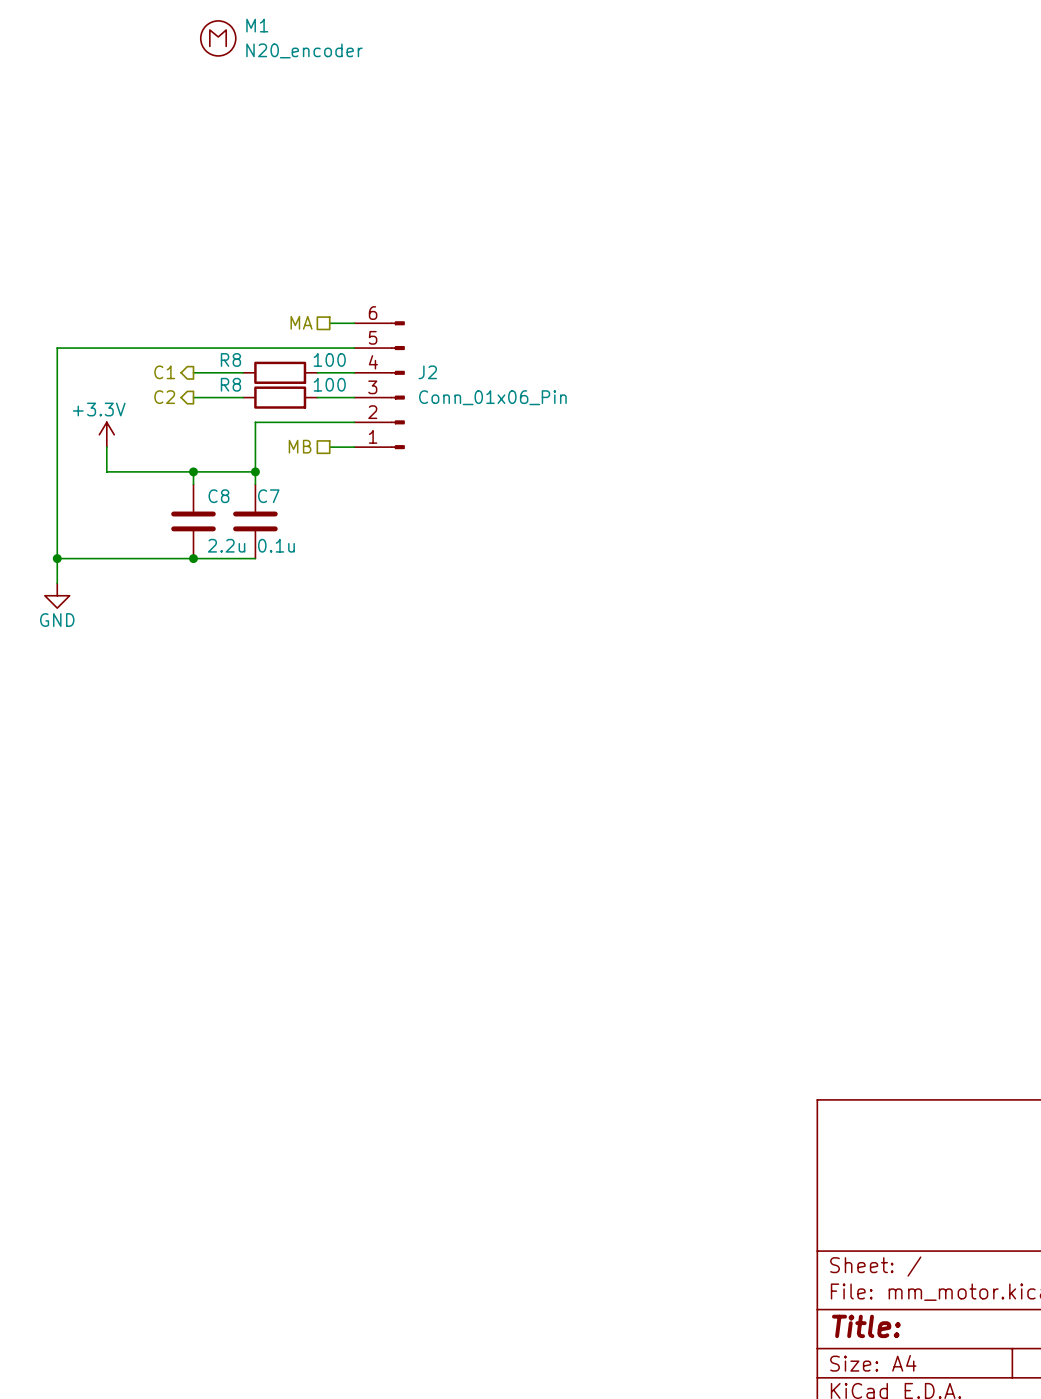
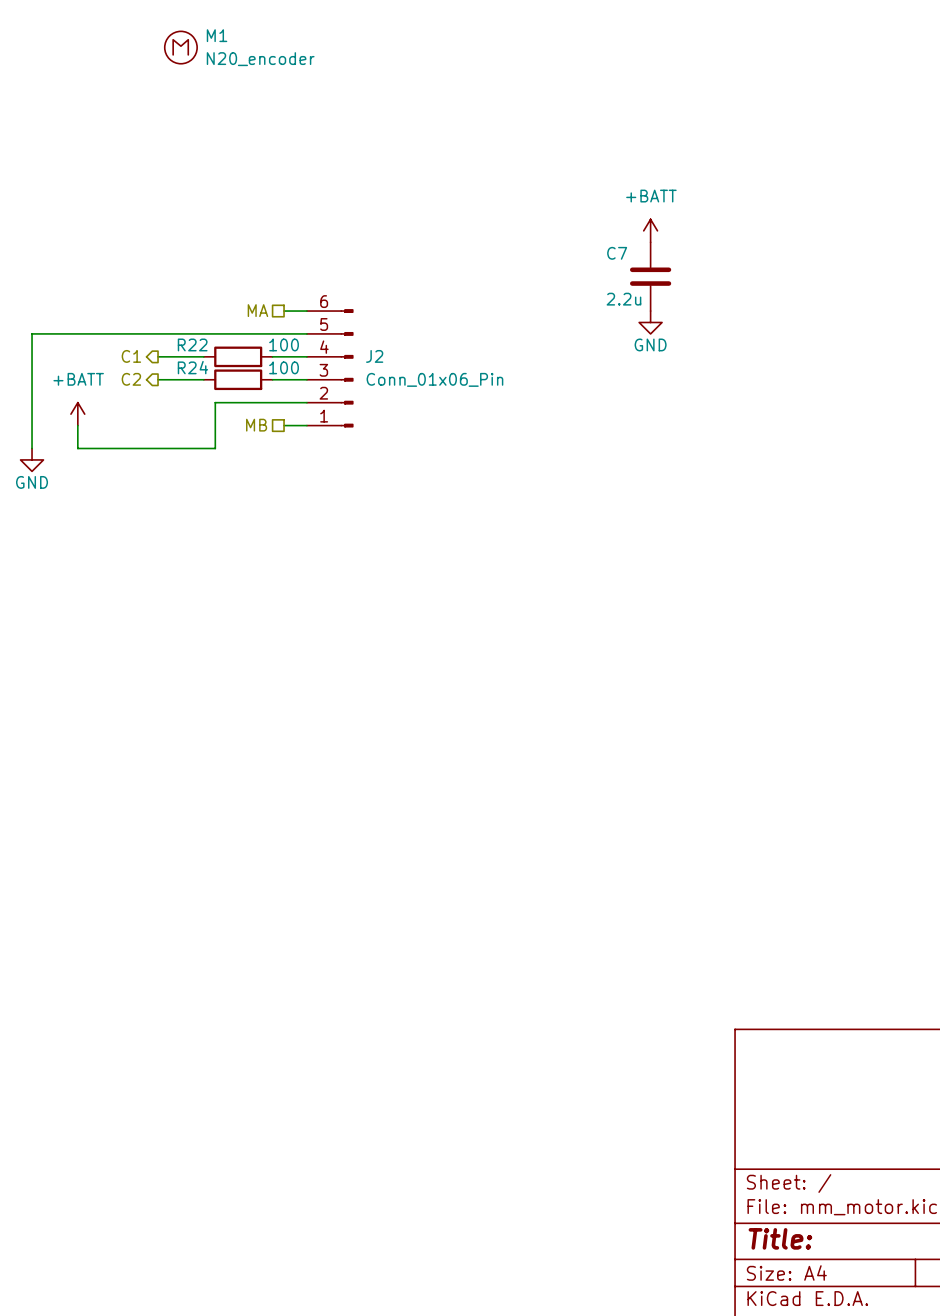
power symbol: none -> +BATT (650, 230)
power symbol: none -> GND (650, 322)
R8 name: R8 (230, 359) -> R22 (192, 344)
R8 name: R8 (230, 384) -> R24 (192, 367)
power symbol: +3.3V (106, 434) -> +BATT (77, 414)
wire: (57, 471) (57, 583) -> none
wire: (193, 471) (193, 484) -> none
junction: (193, 471) -> none
wire: (255, 471) (255, 484) -> none
junction: (255, 471) -> none
C7 name position: C7 (268, 496) -> C7 (617, 253)
C8: 2.2u (193, 521) -> none
C7 position: (255, 521) -> (650, 276)
C7 value: 0.1u (276, 545) -> 2.2u (623, 299)
wire: (57, 558) (255, 558) -> none
junction: (57, 558) -> none
junction: (193, 558) -> none
power symbol position: GND (57, 595) -> GND (32, 459)

